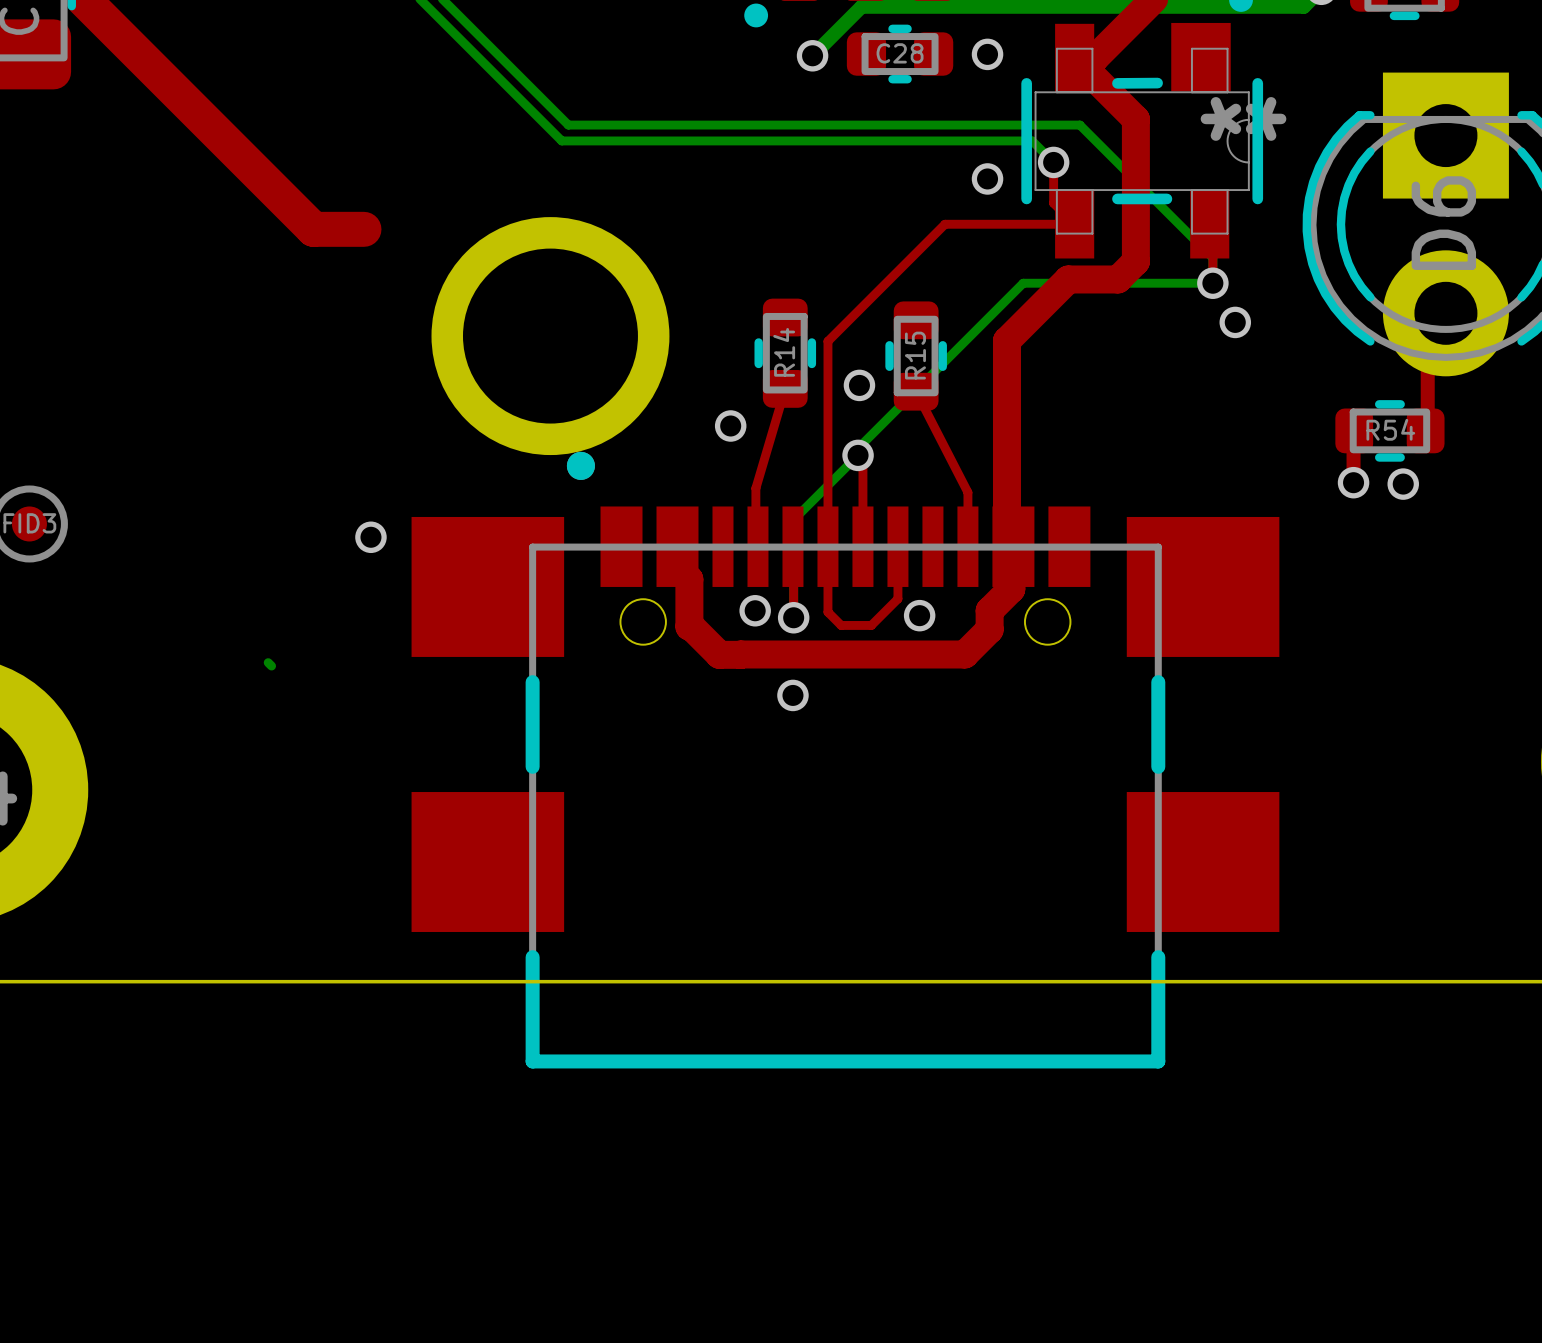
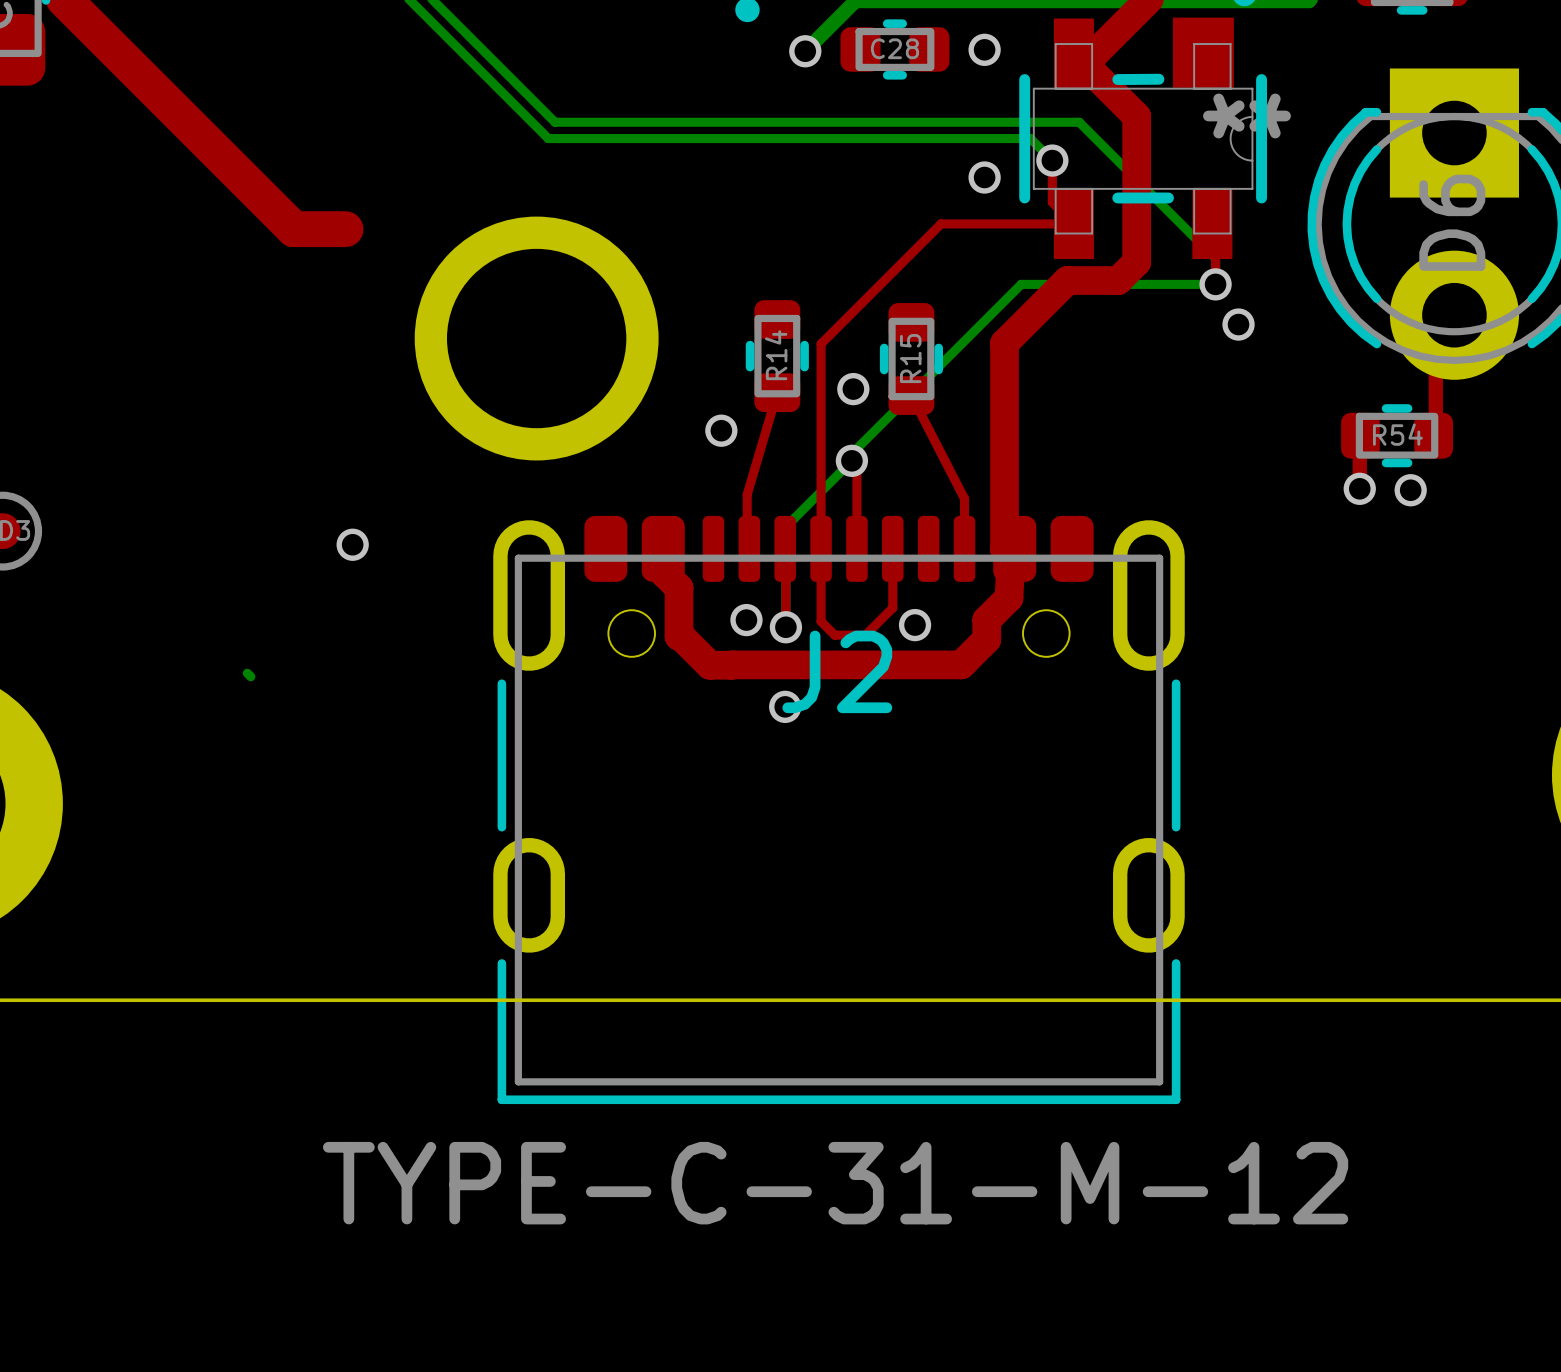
part: (845, 760) -> none
J2: none -> TYPE-C-31-M-12 (839, 809)

